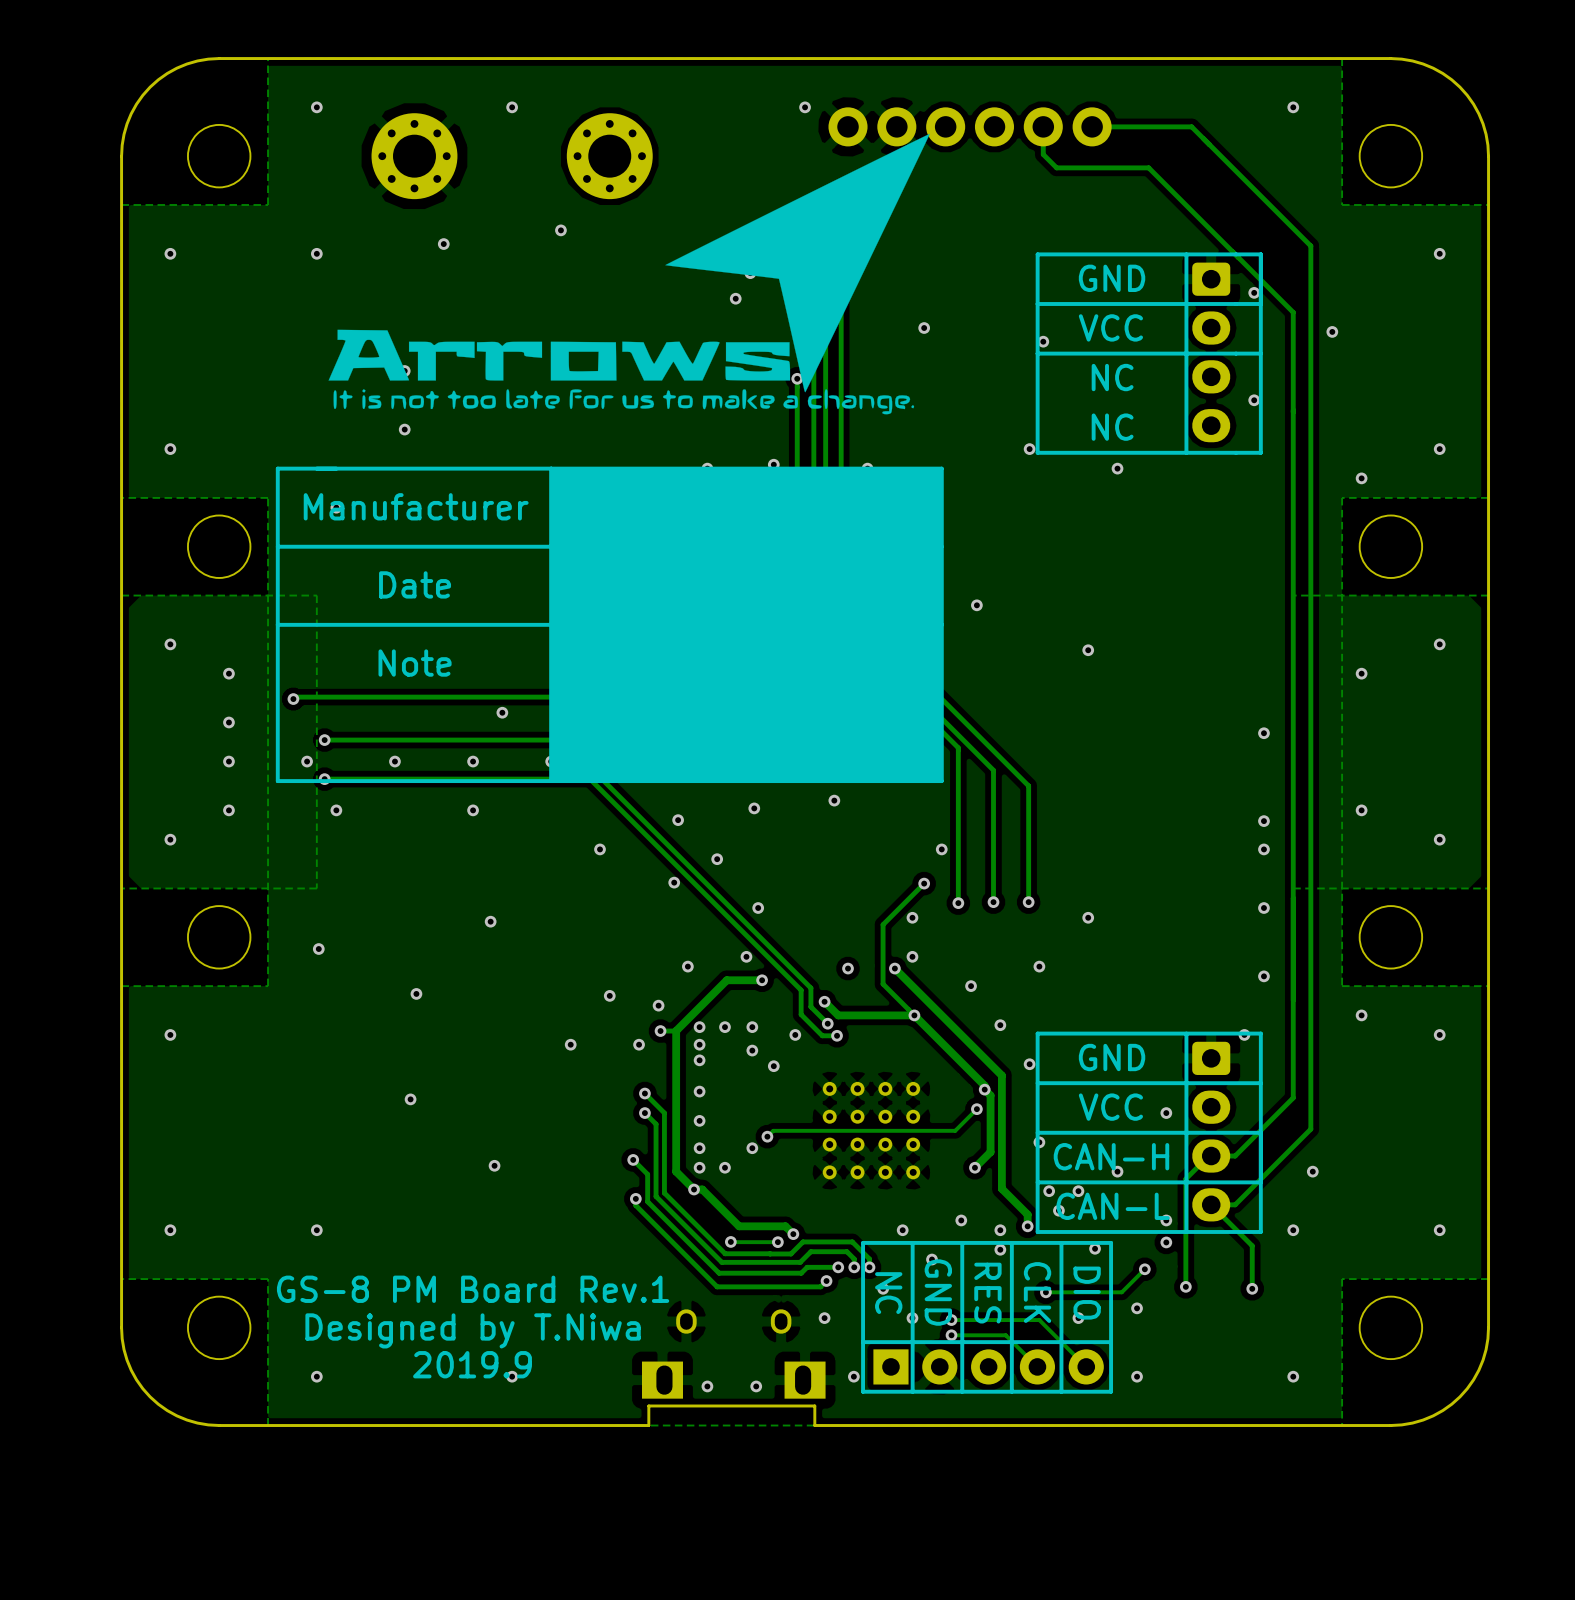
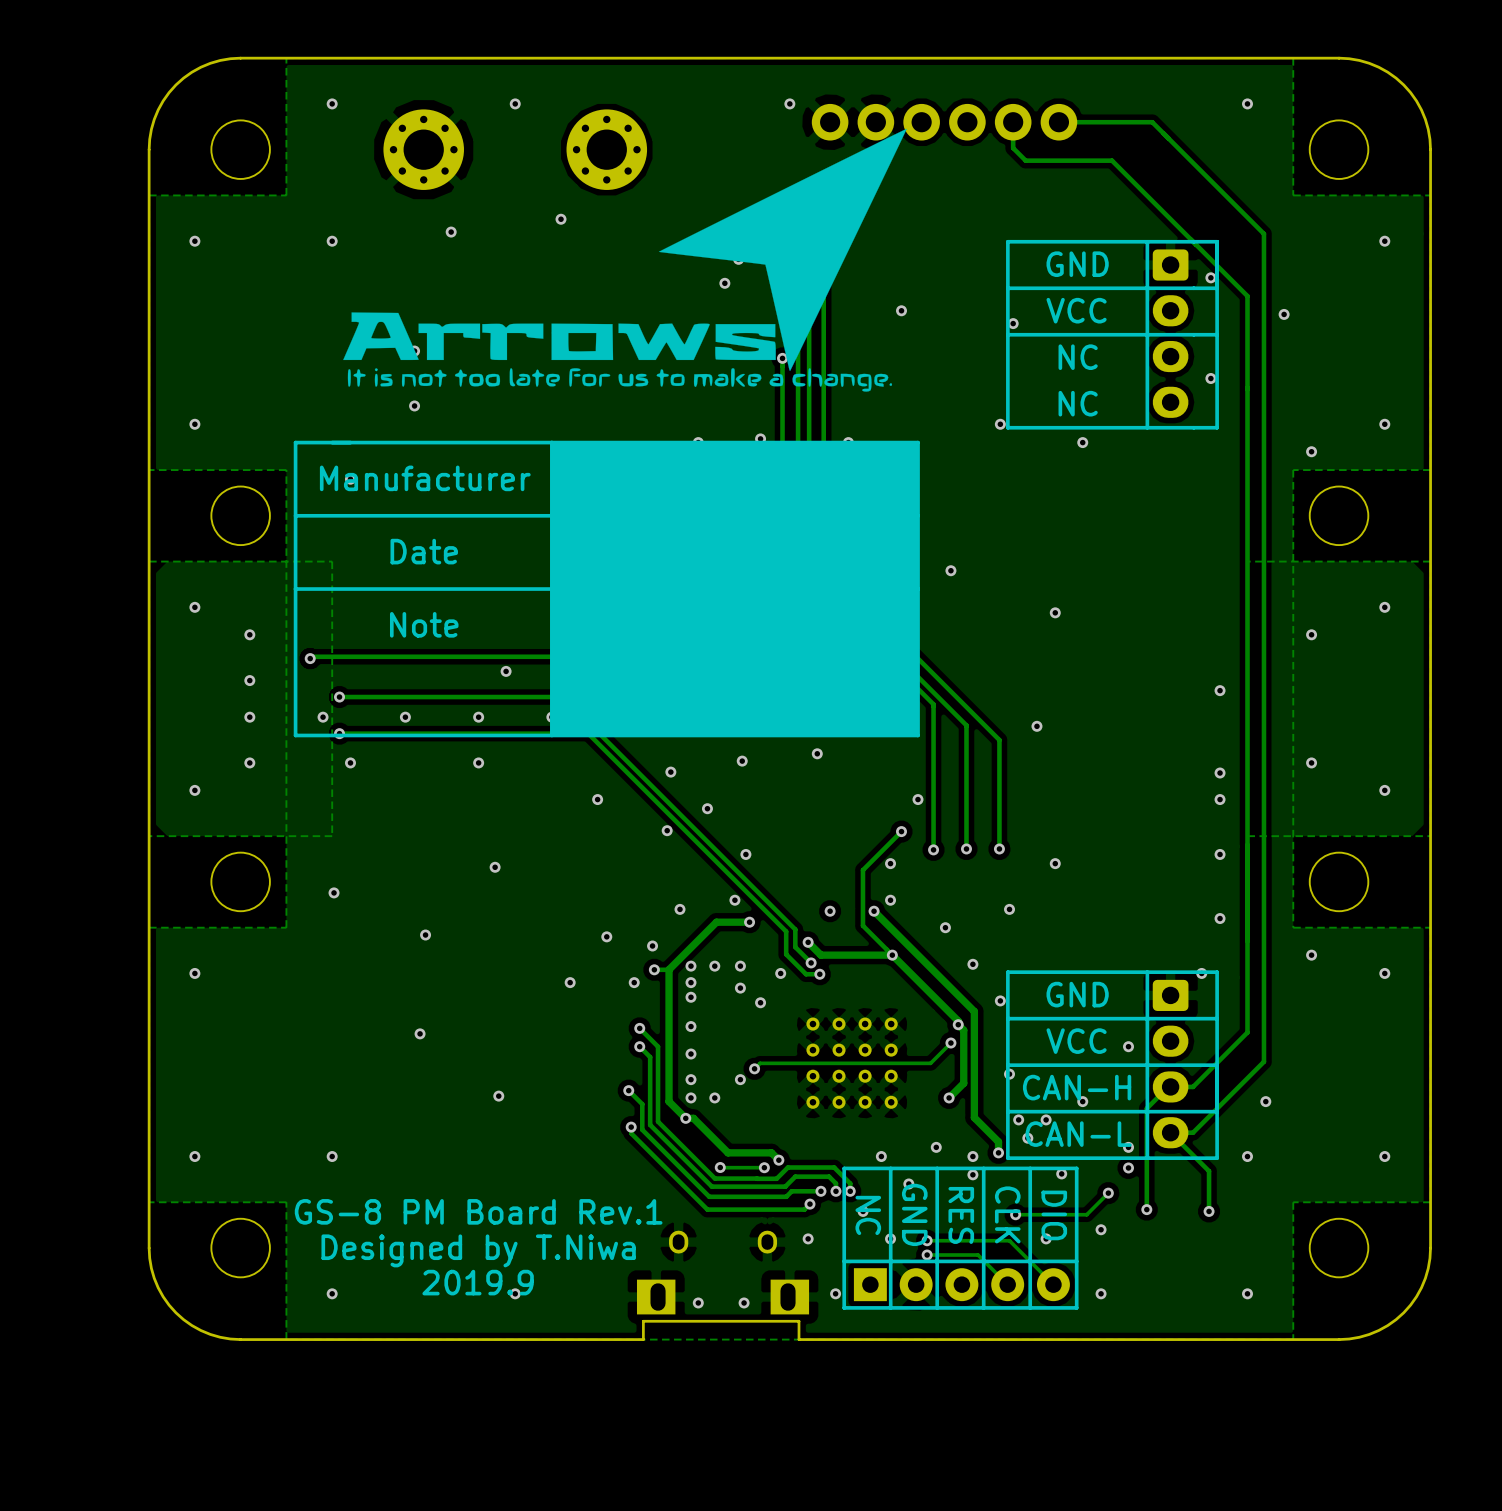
via: none -> (1036, 726)

